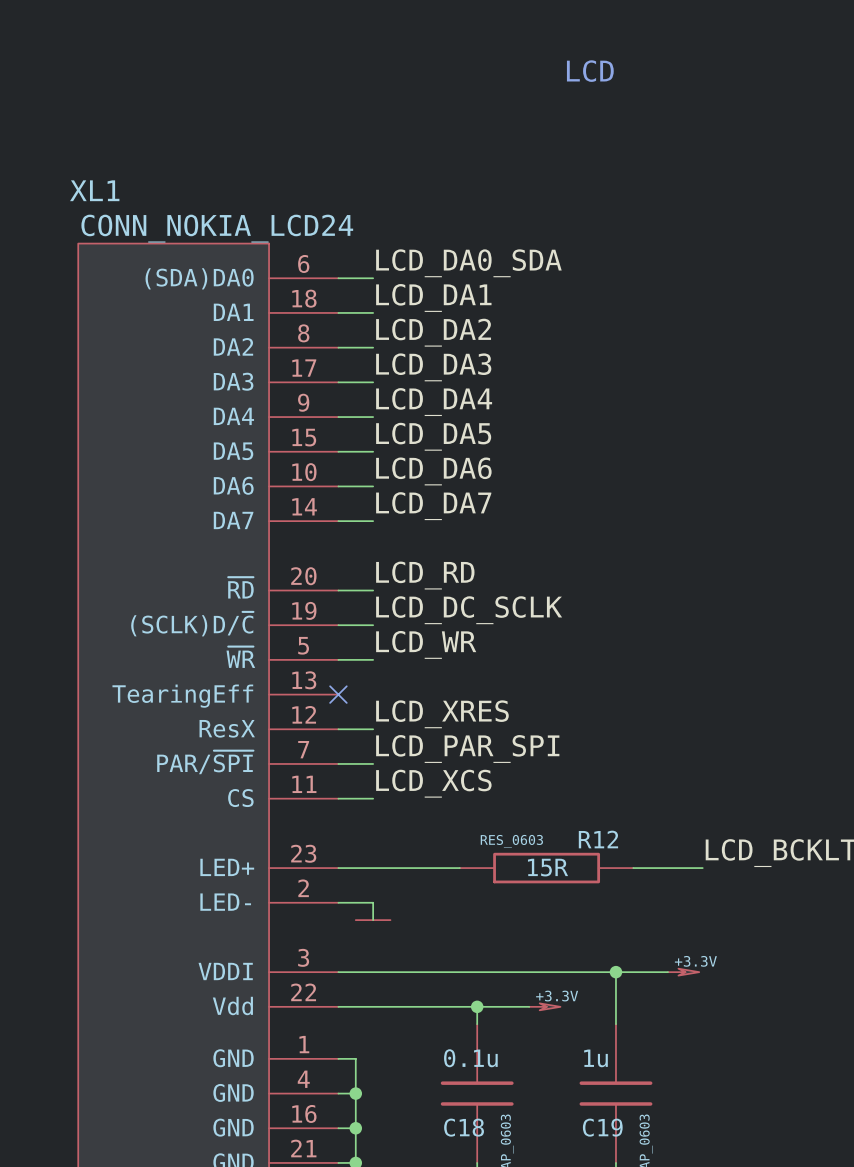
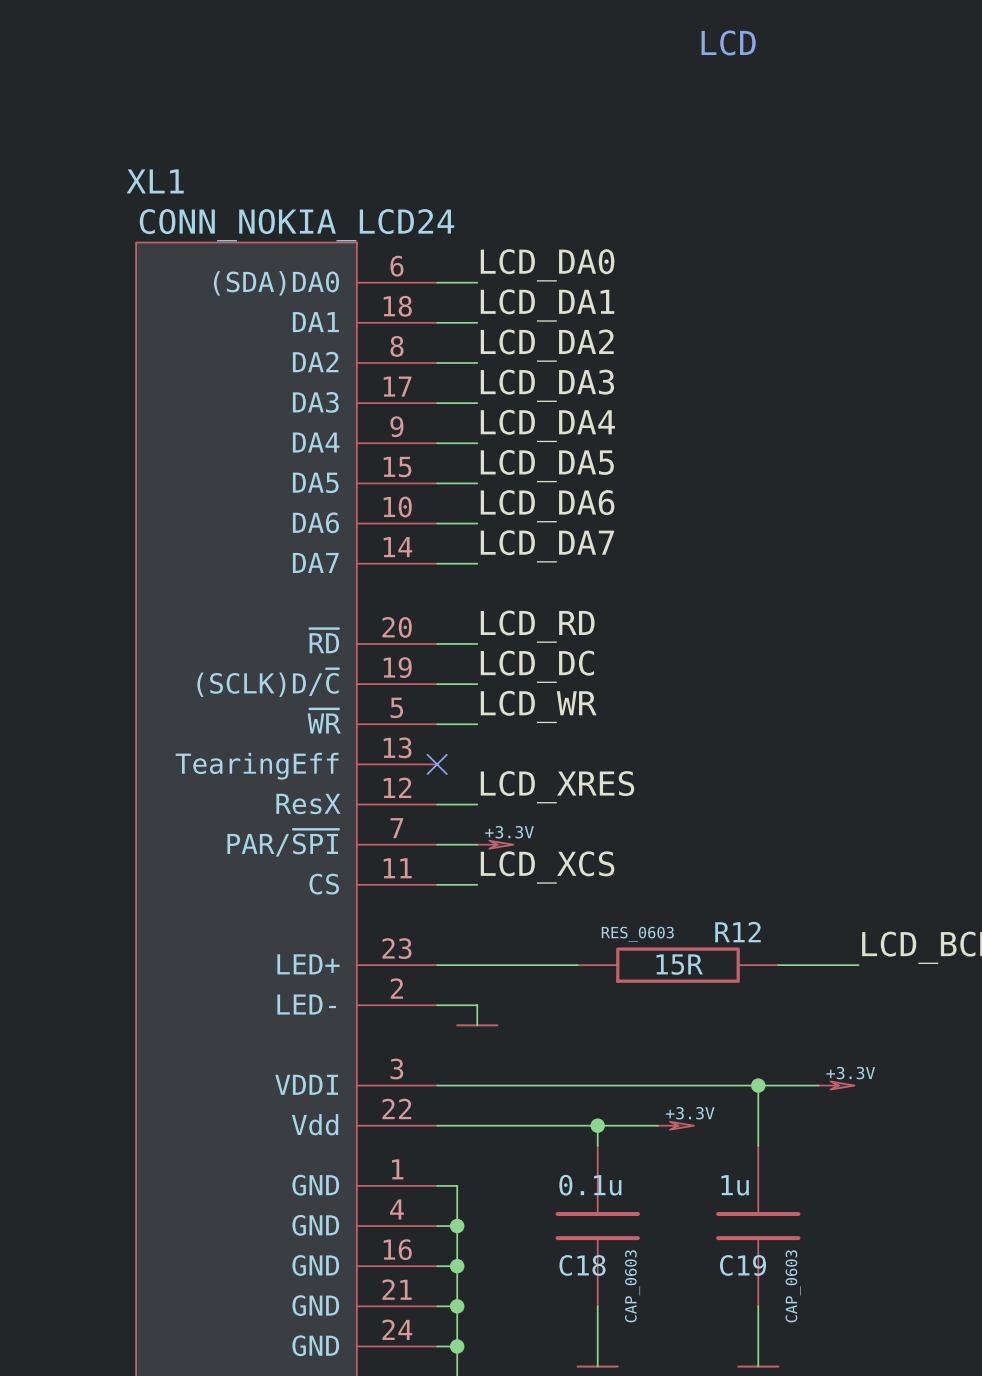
label: LCD_DA0_SDA (468, 263) -> LCD_DA0 (547, 265)
label: LCD_DC_SCLK (469, 610) -> LCD_DC (537, 666)
label: LCD_PAR_SPI (467, 749) -> none
power symbol: none -> +3.3V (495, 844)

